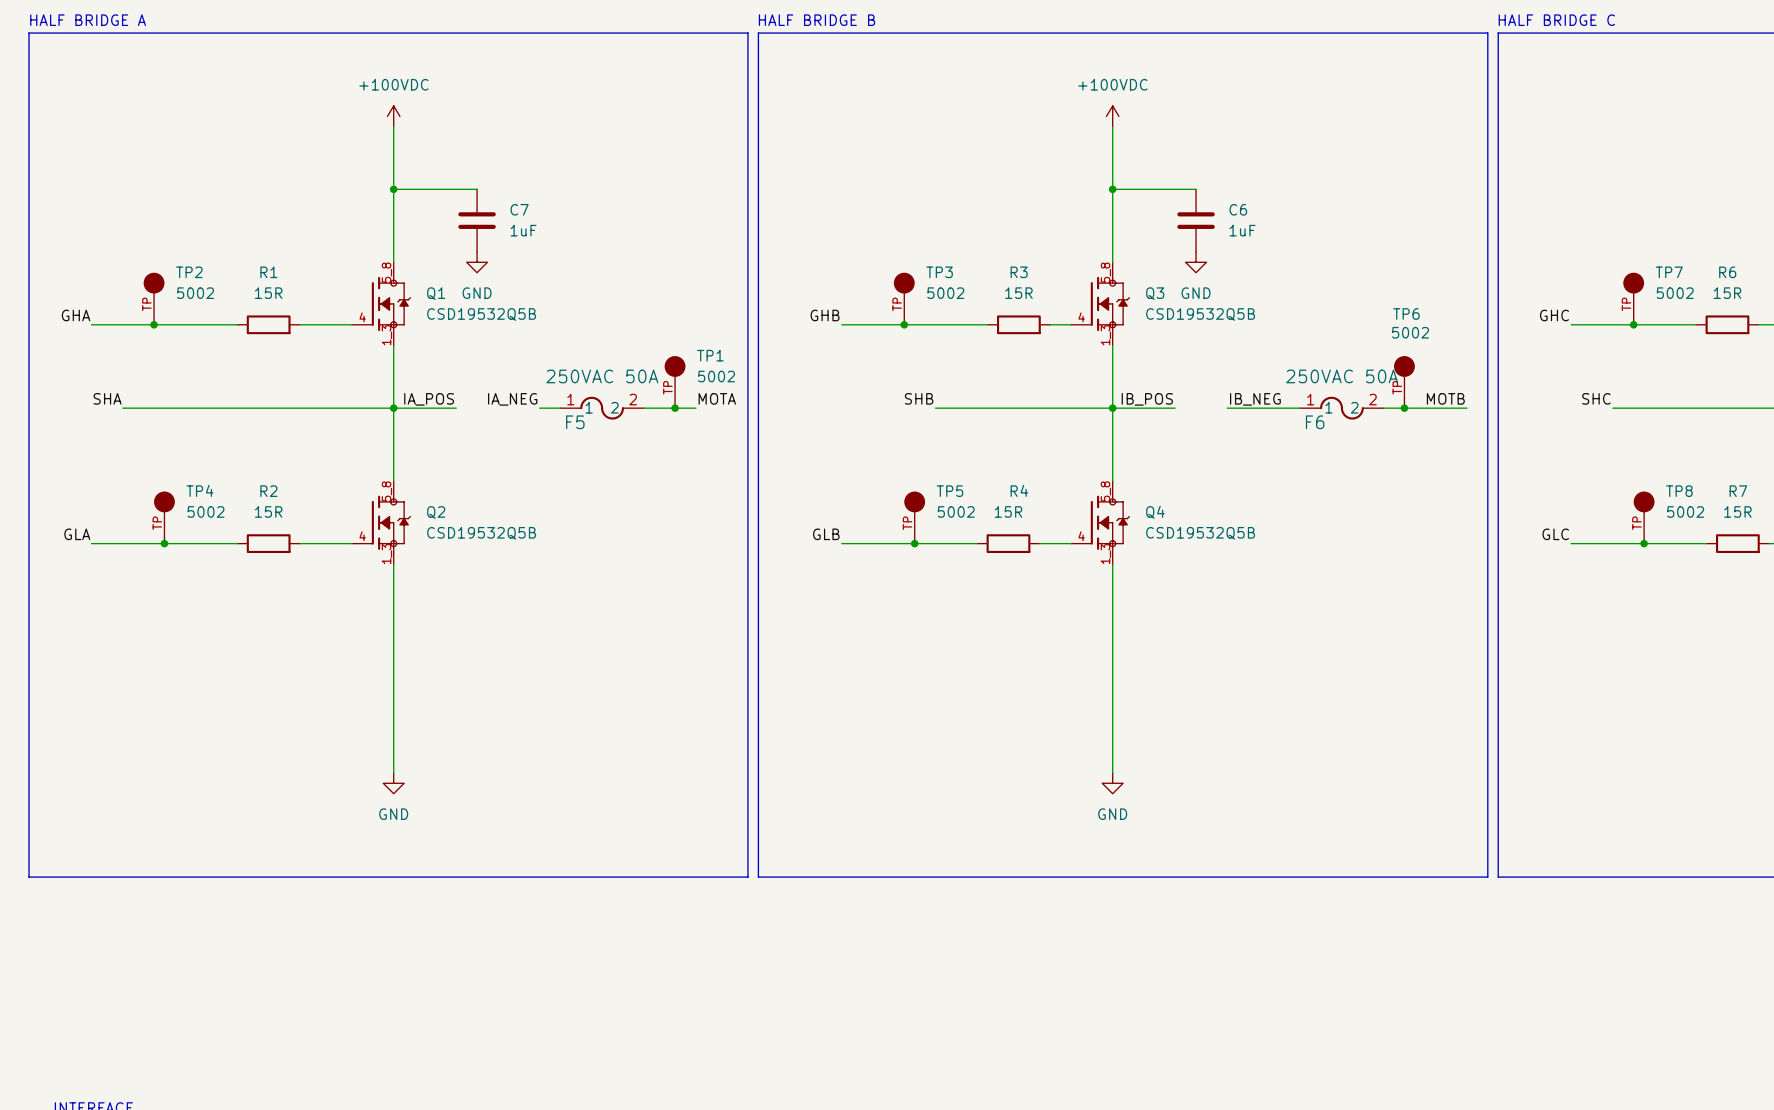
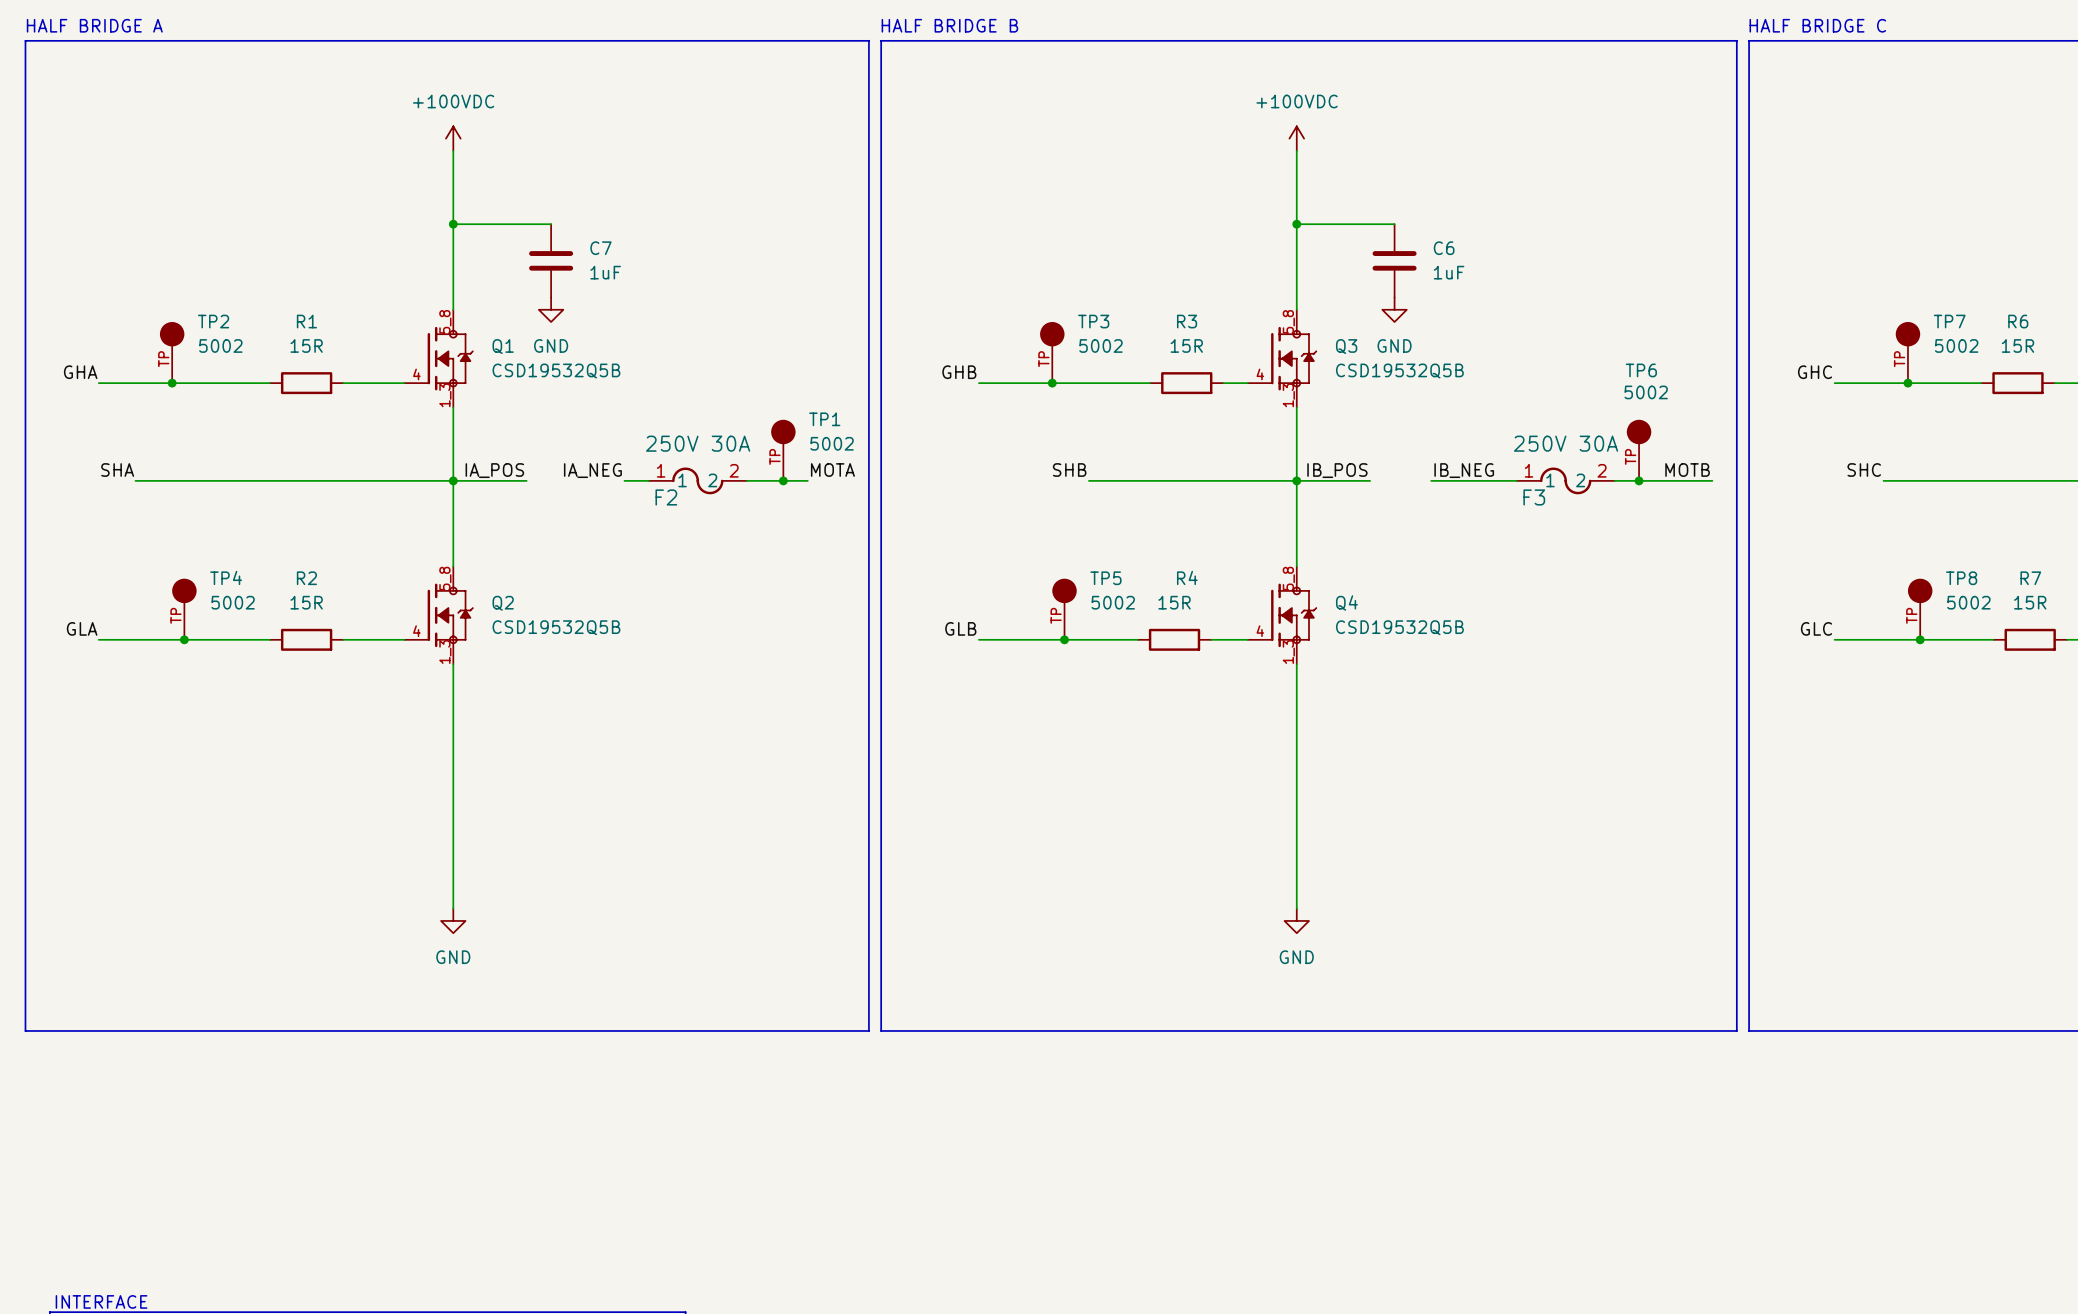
F5 value: 250VAC 50A (602, 376) -> 250V 30A (698, 443)
F6 value: 250VAC 50A (1342, 376) -> 250V 30A (1566, 443)
F5 name: F5 (575, 422) -> F2 (666, 497)
F6 name: F6 (1315, 422) -> F3 (1534, 497)

